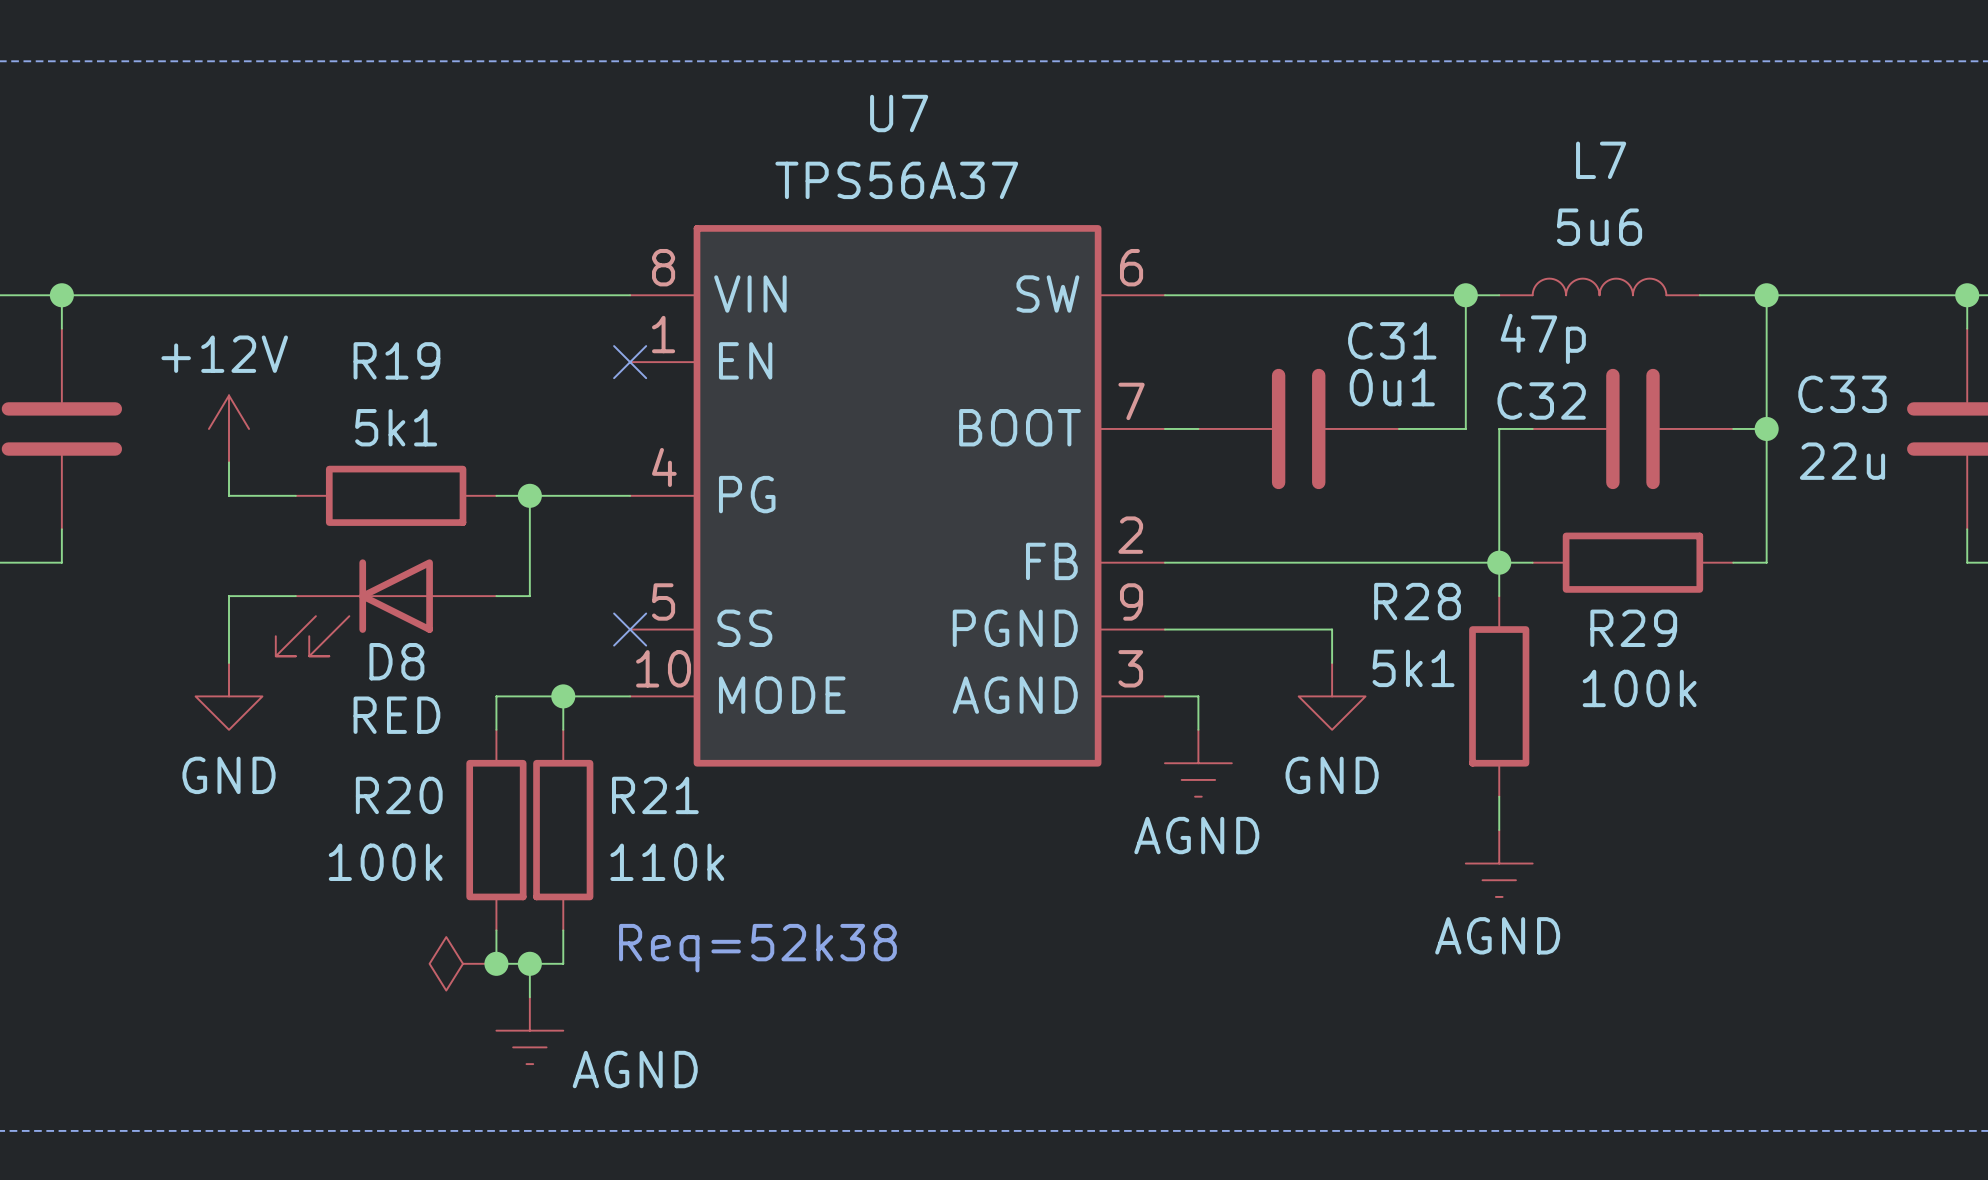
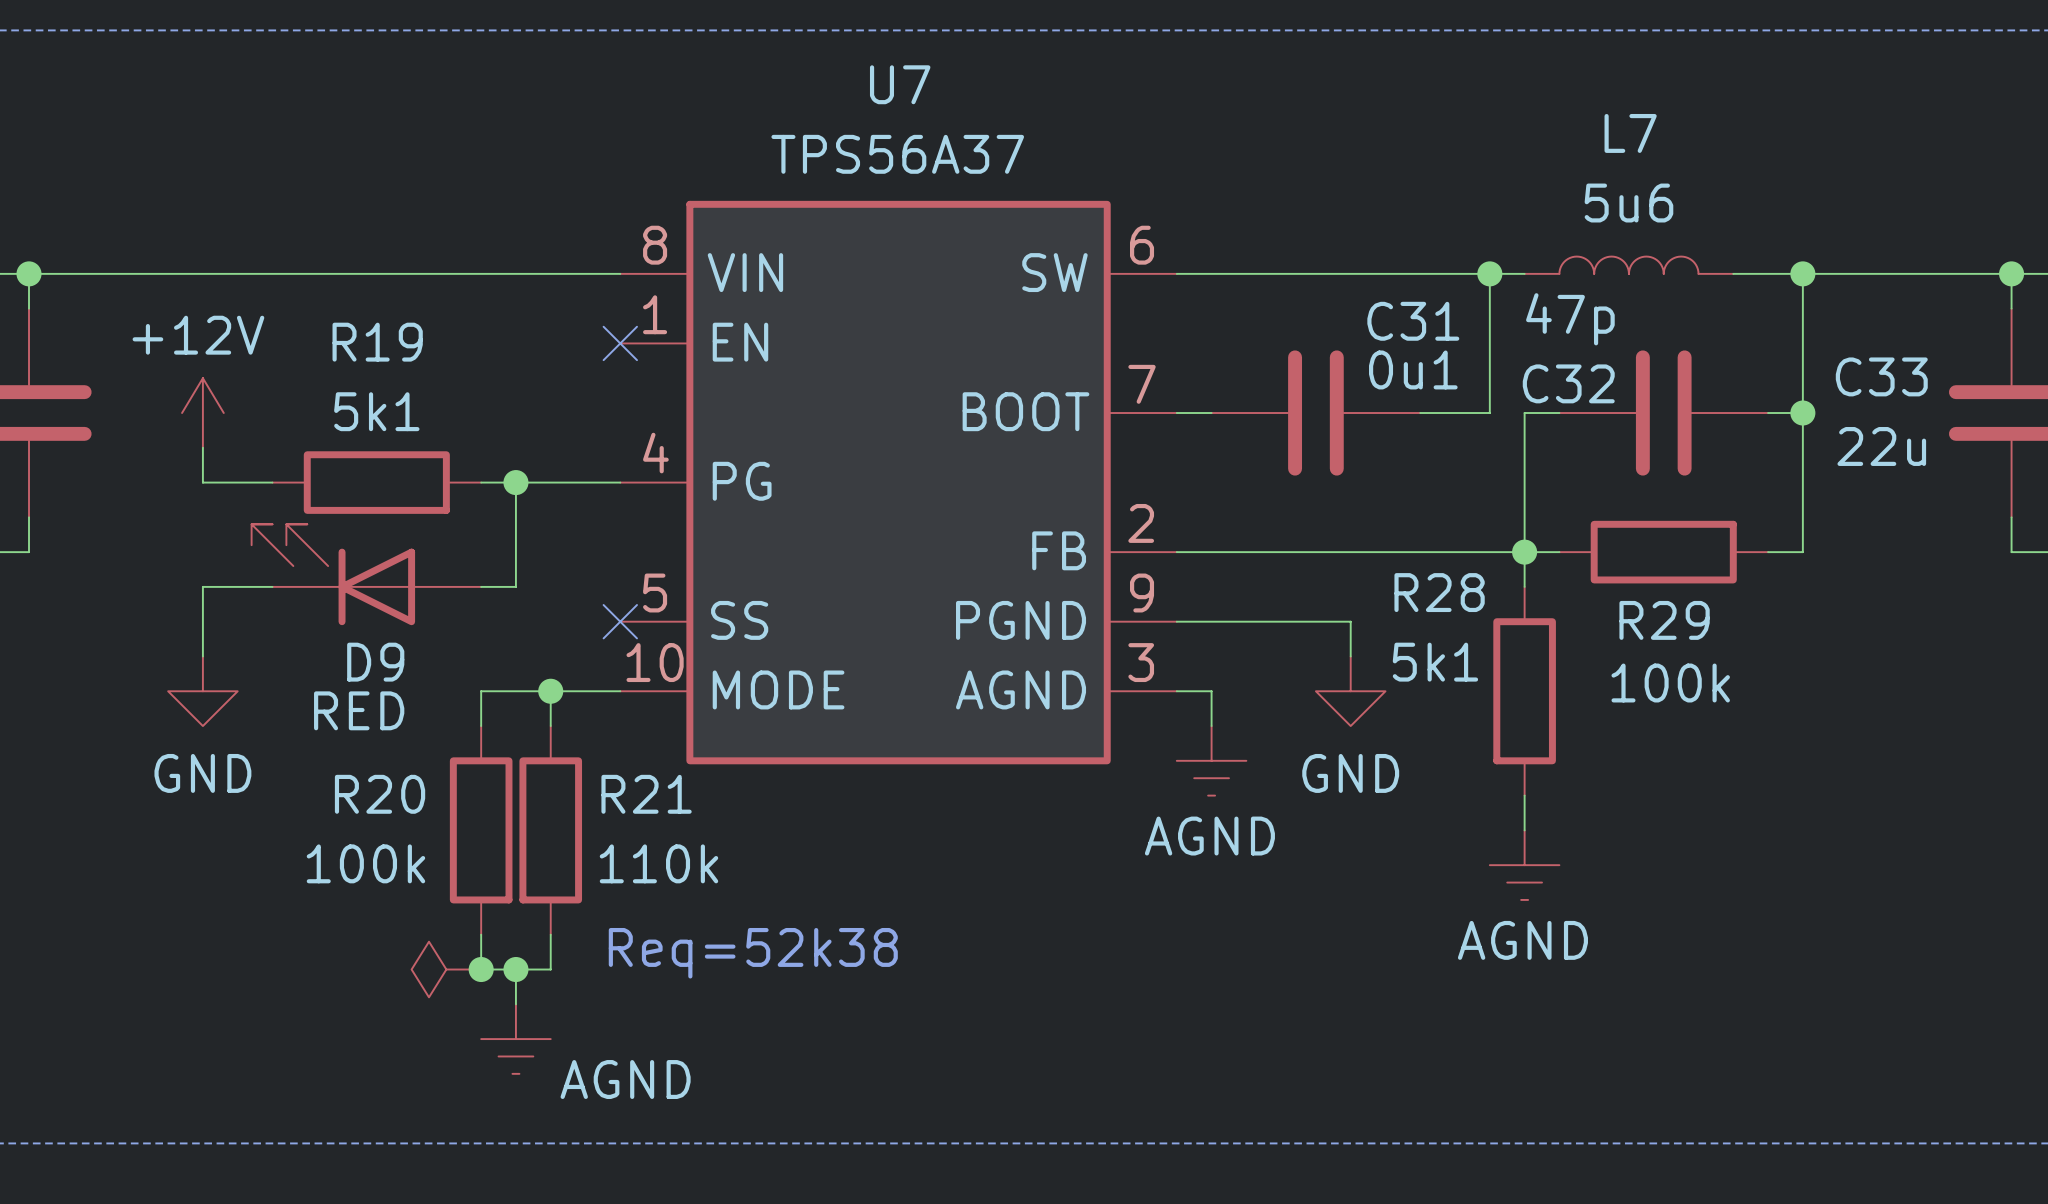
D9: none -> RED (366, 574)
D8: RED (386, 607) -> none

